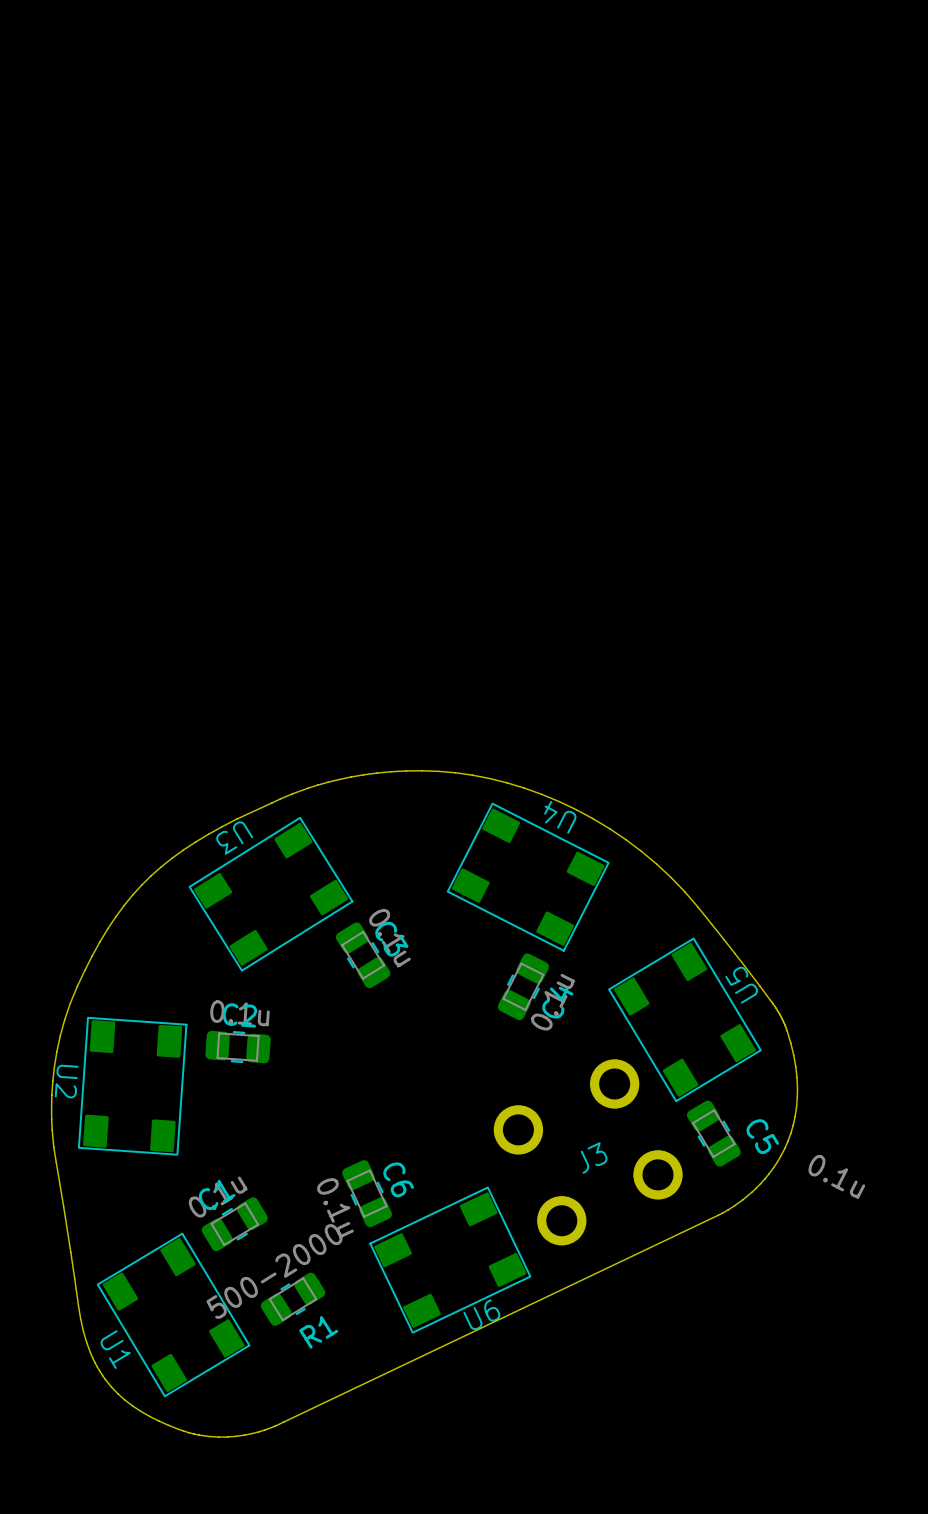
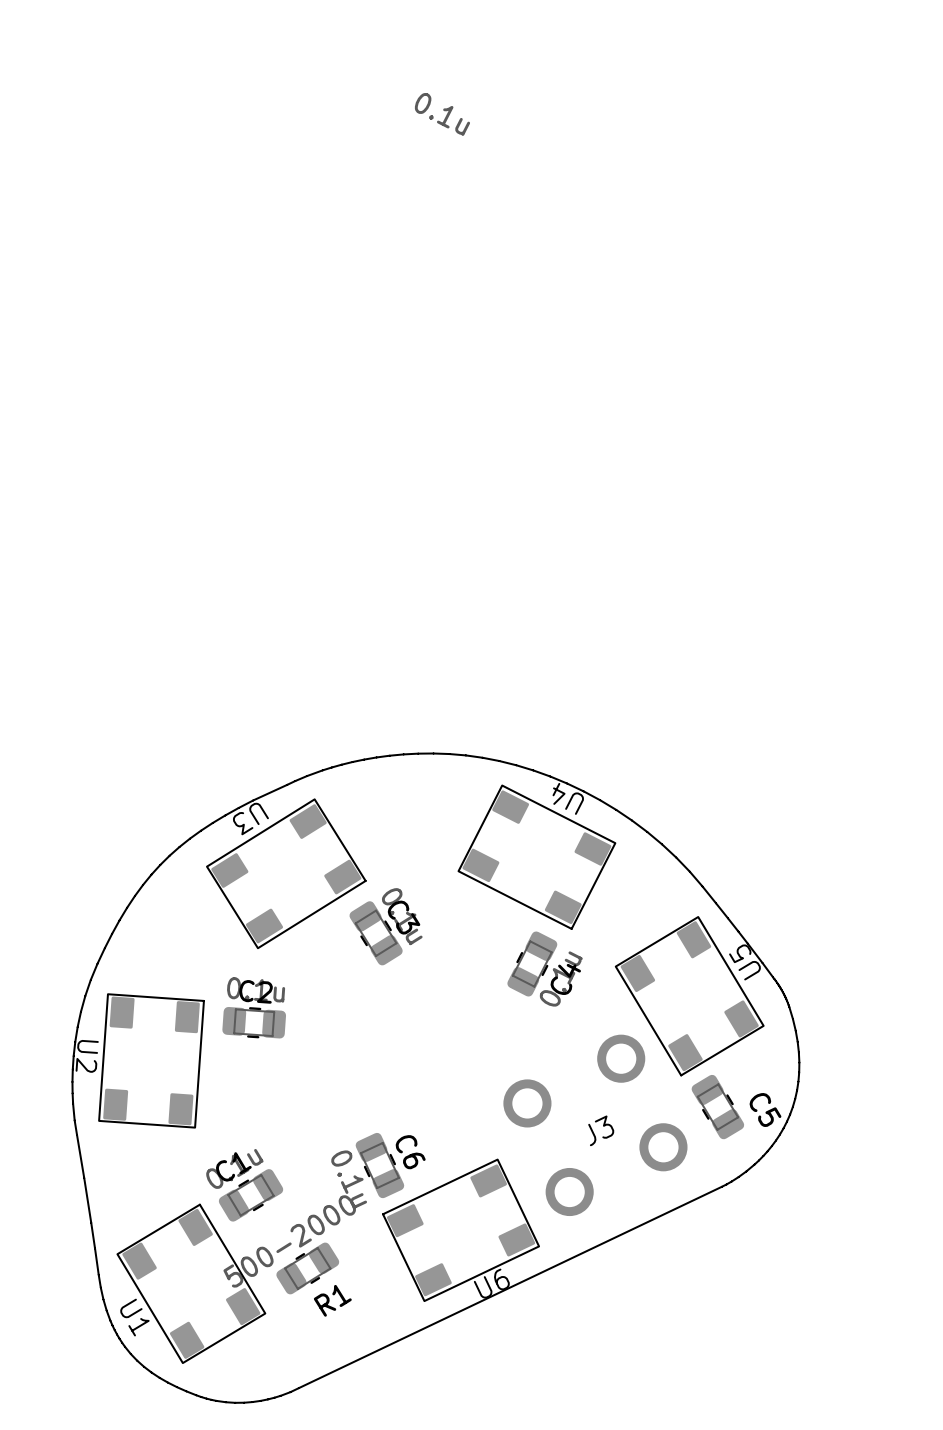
C5 value position: 0.1u (836, 1177) -> 0.1u (442, 114)

